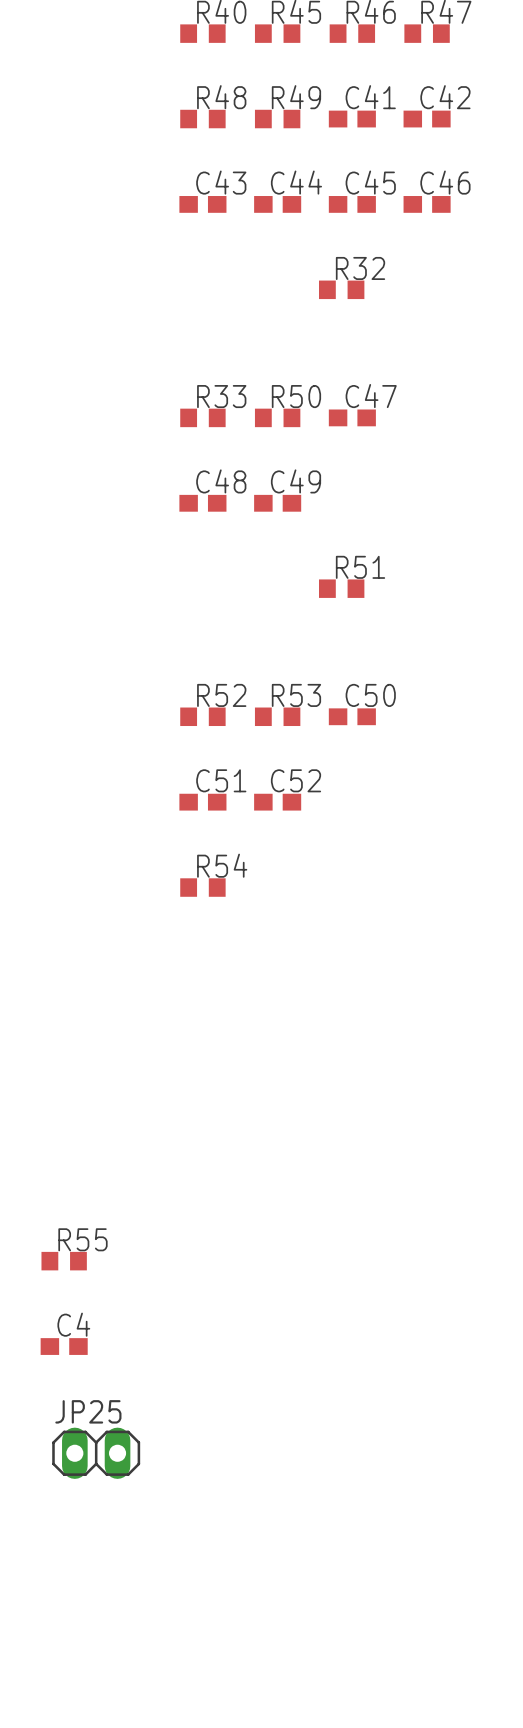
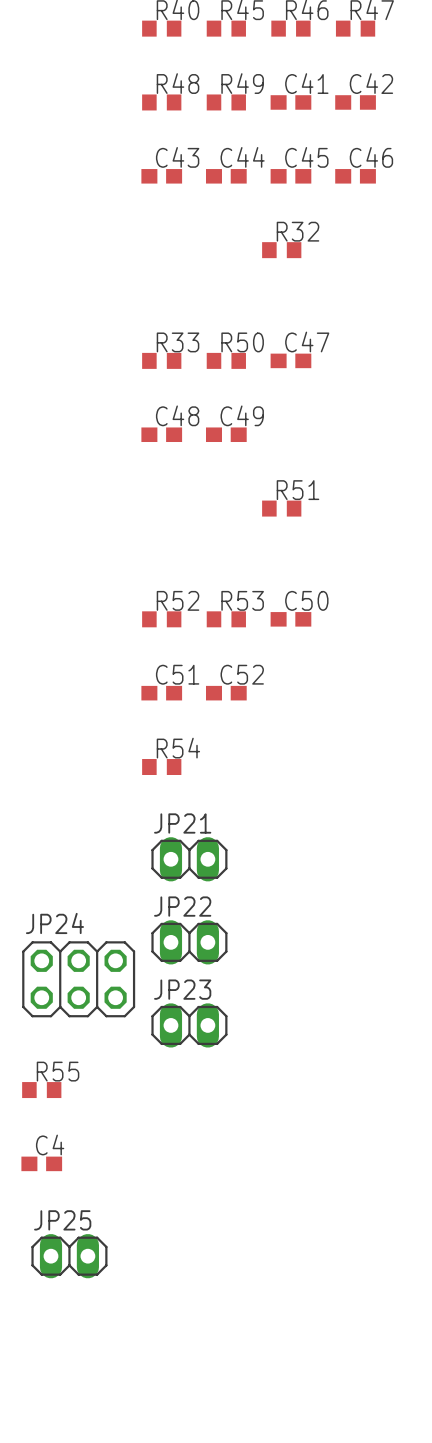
JP21: none -> (189, 859)
JP22: none -> (189, 942)
JP24: none -> (78, 979)
JP23: none -> (189, 1025)

